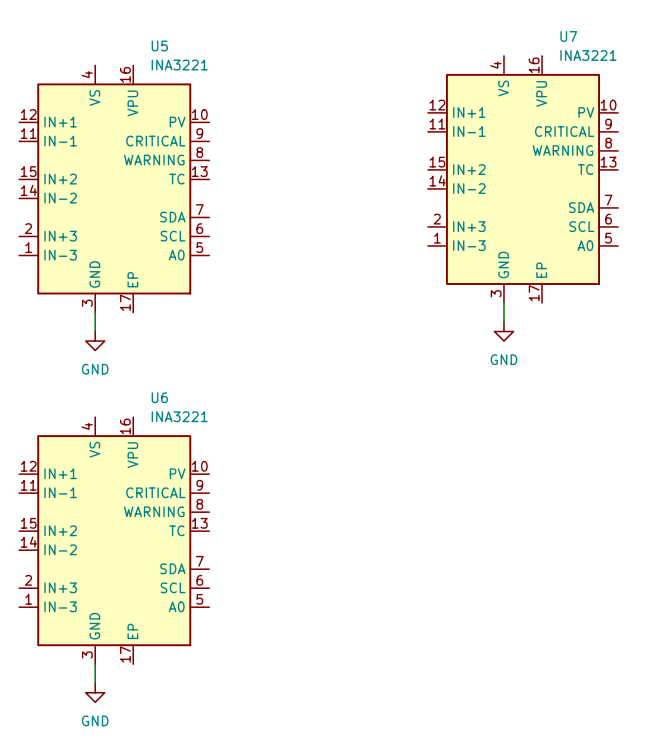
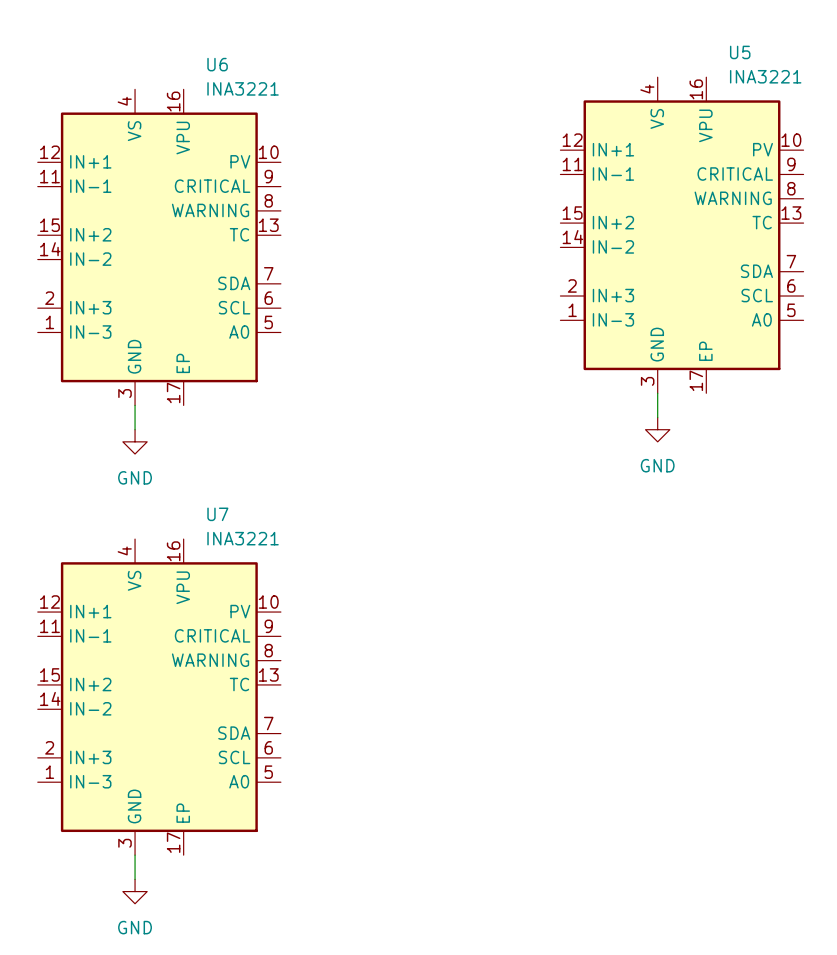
U7 name: U7 (568, 36) -> U5 (740, 52)
U5 name: U5 (159, 46) -> U6 (217, 64)
U6 name: U6 (159, 397) -> U7 (217, 514)

